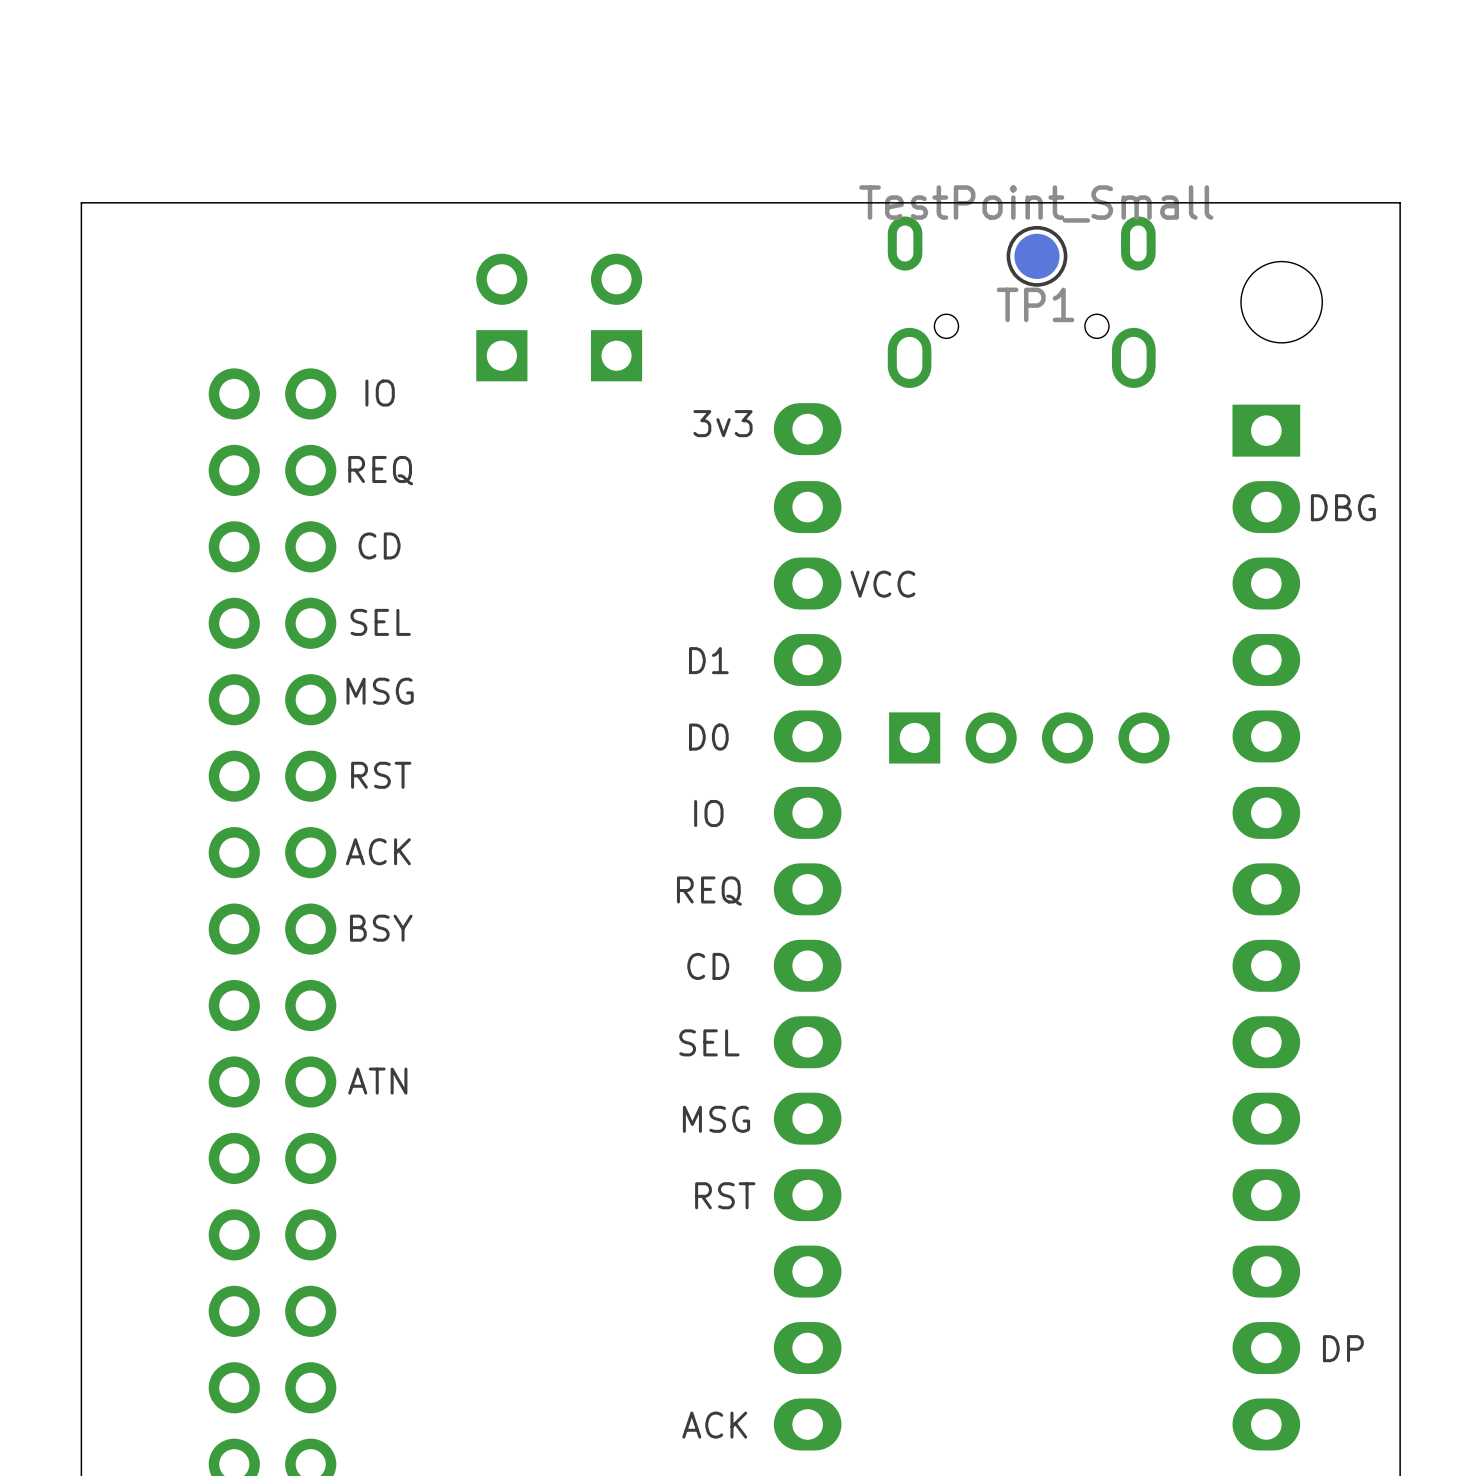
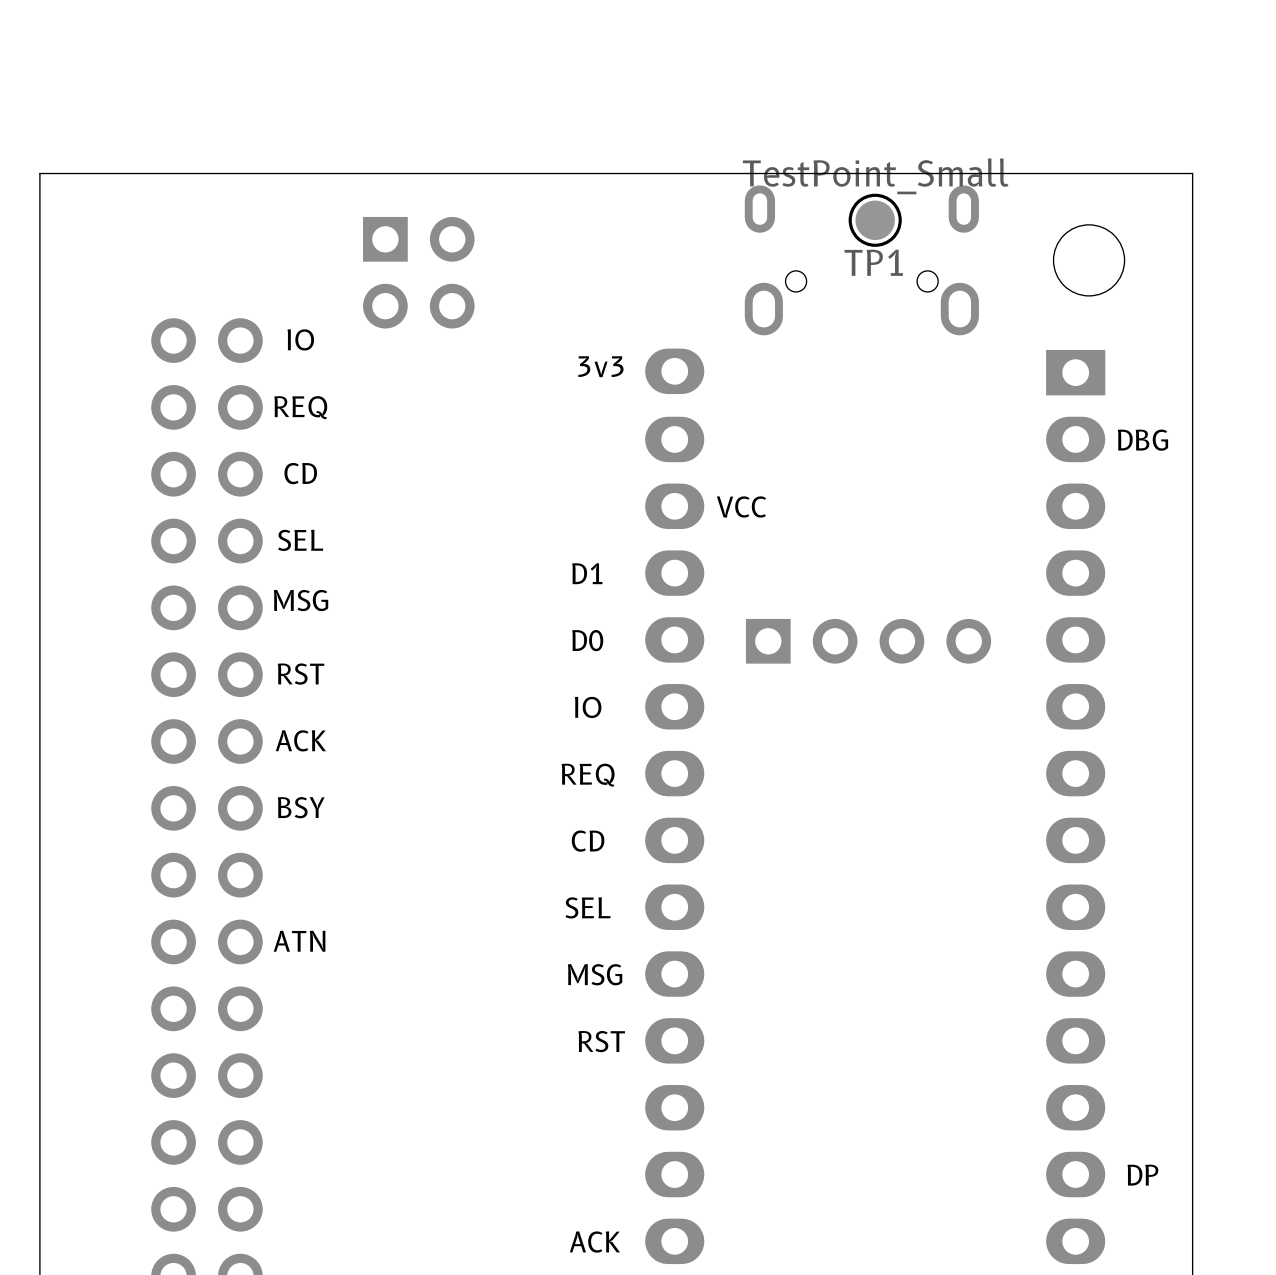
part footprint: [476, 253, 528, 382] -> [363, 216, 475, 329]
part: (616, 317) -> none

